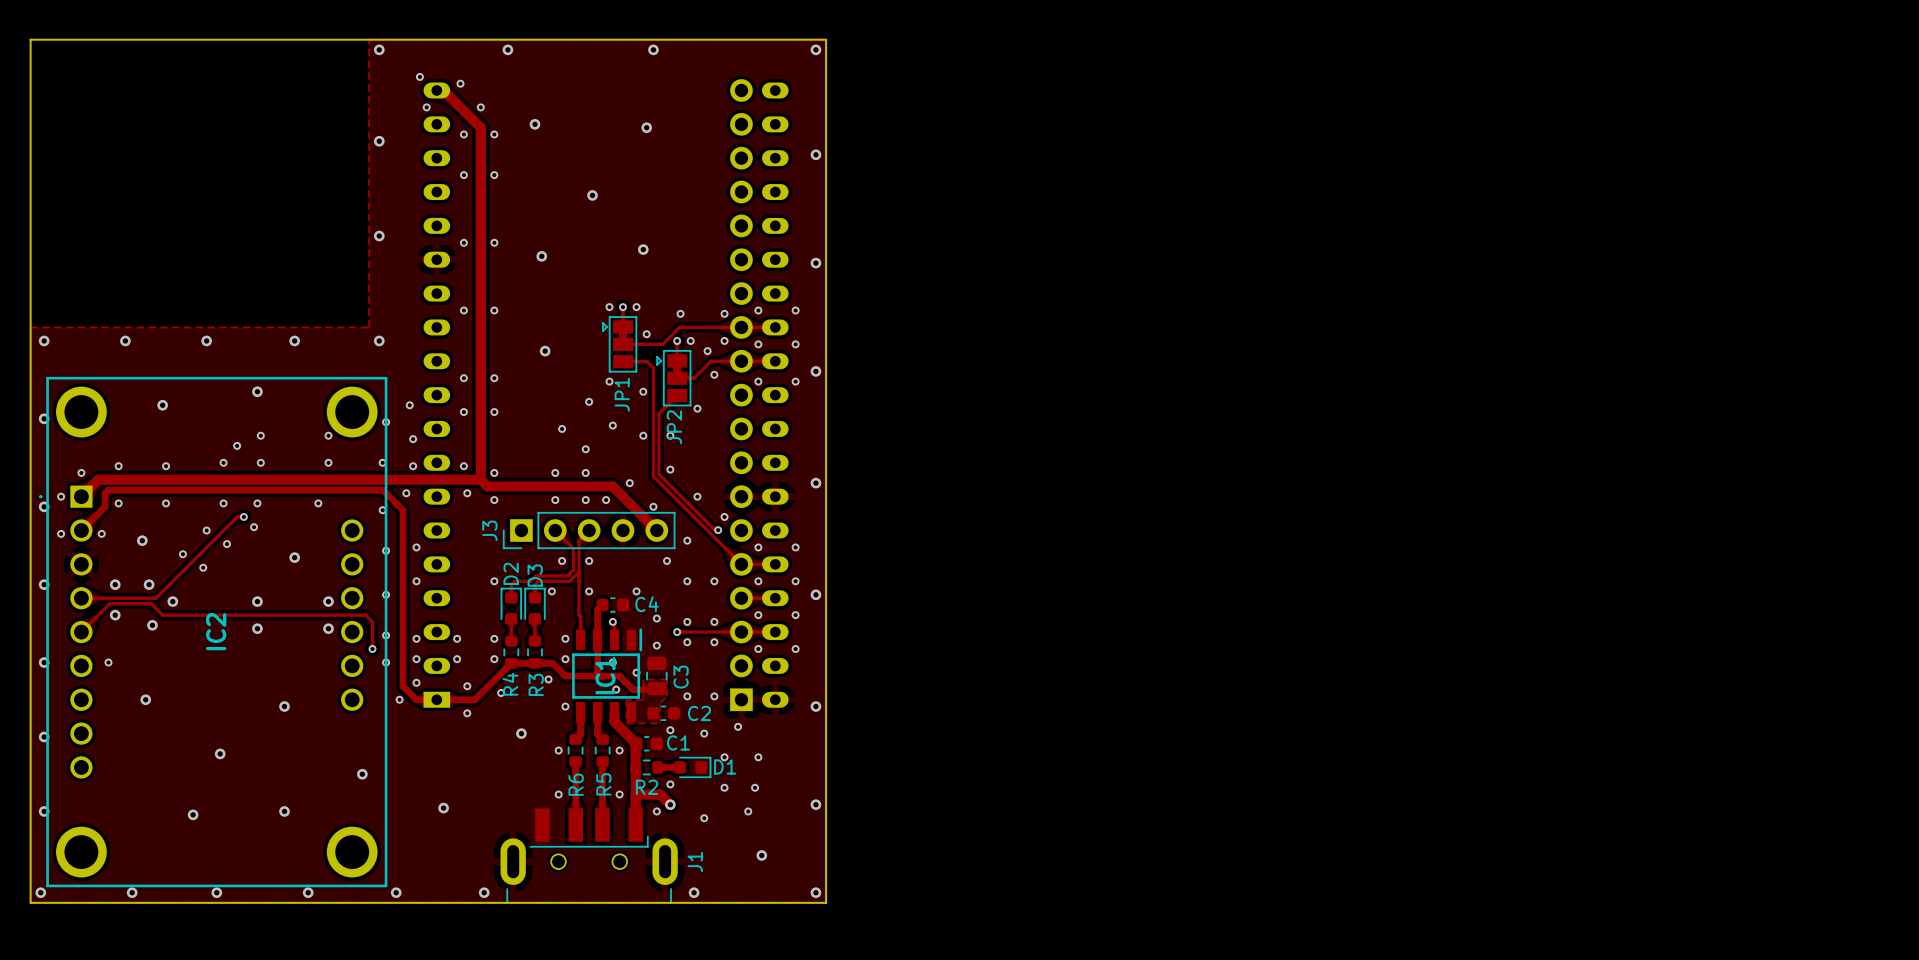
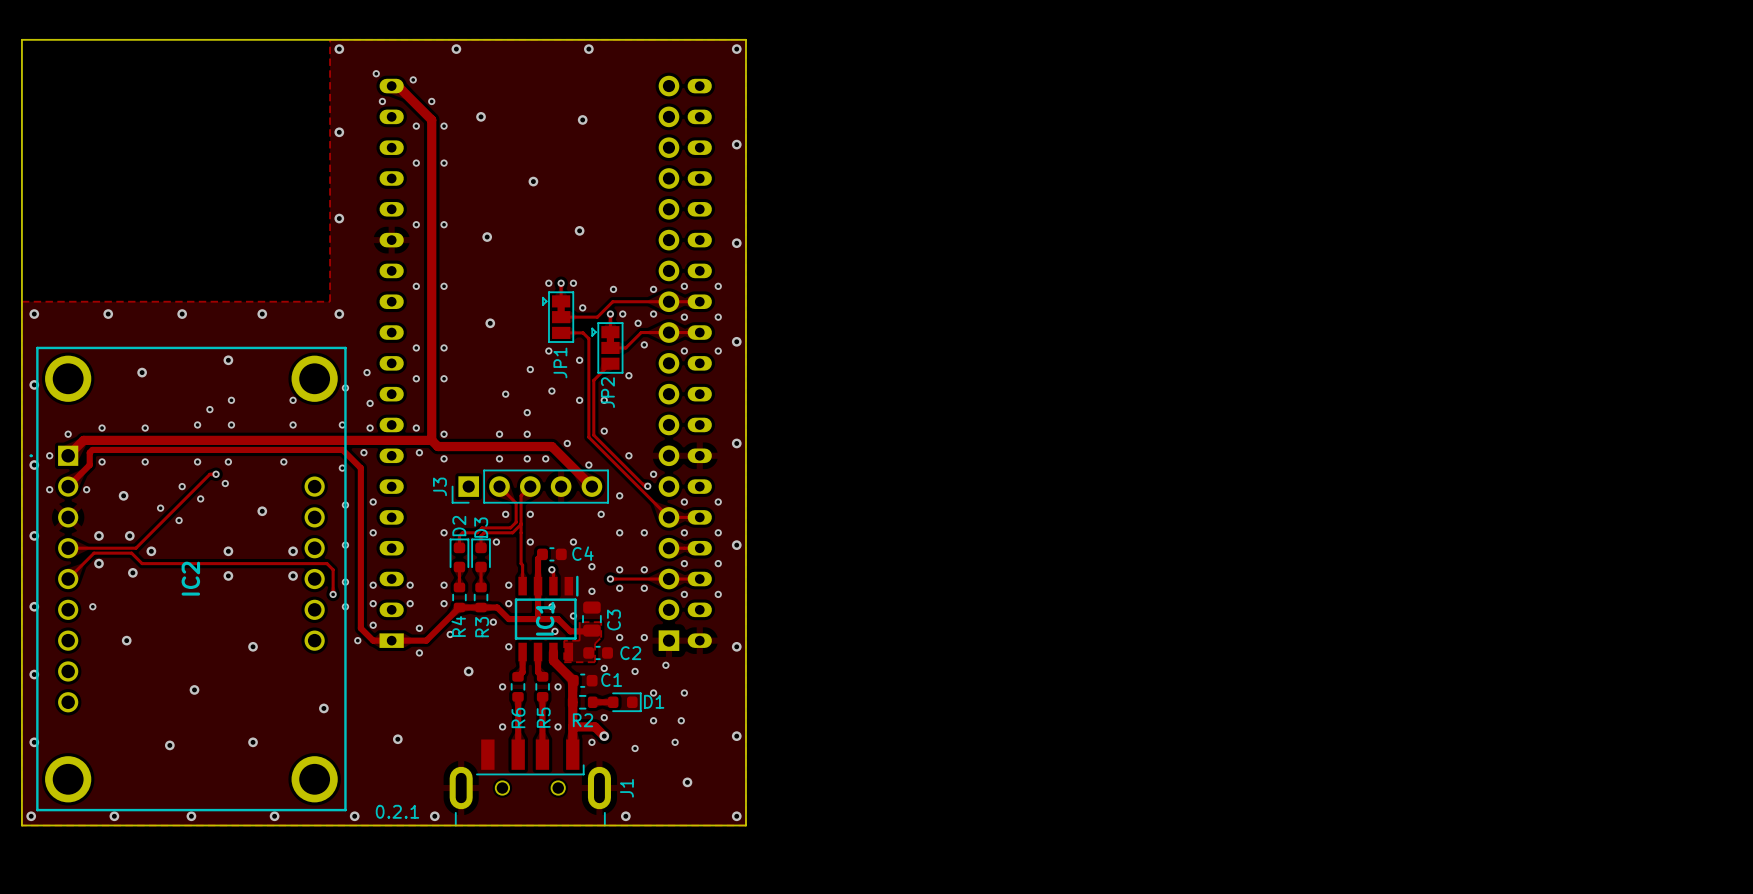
text: none -> 0.2.1 (397, 811)

